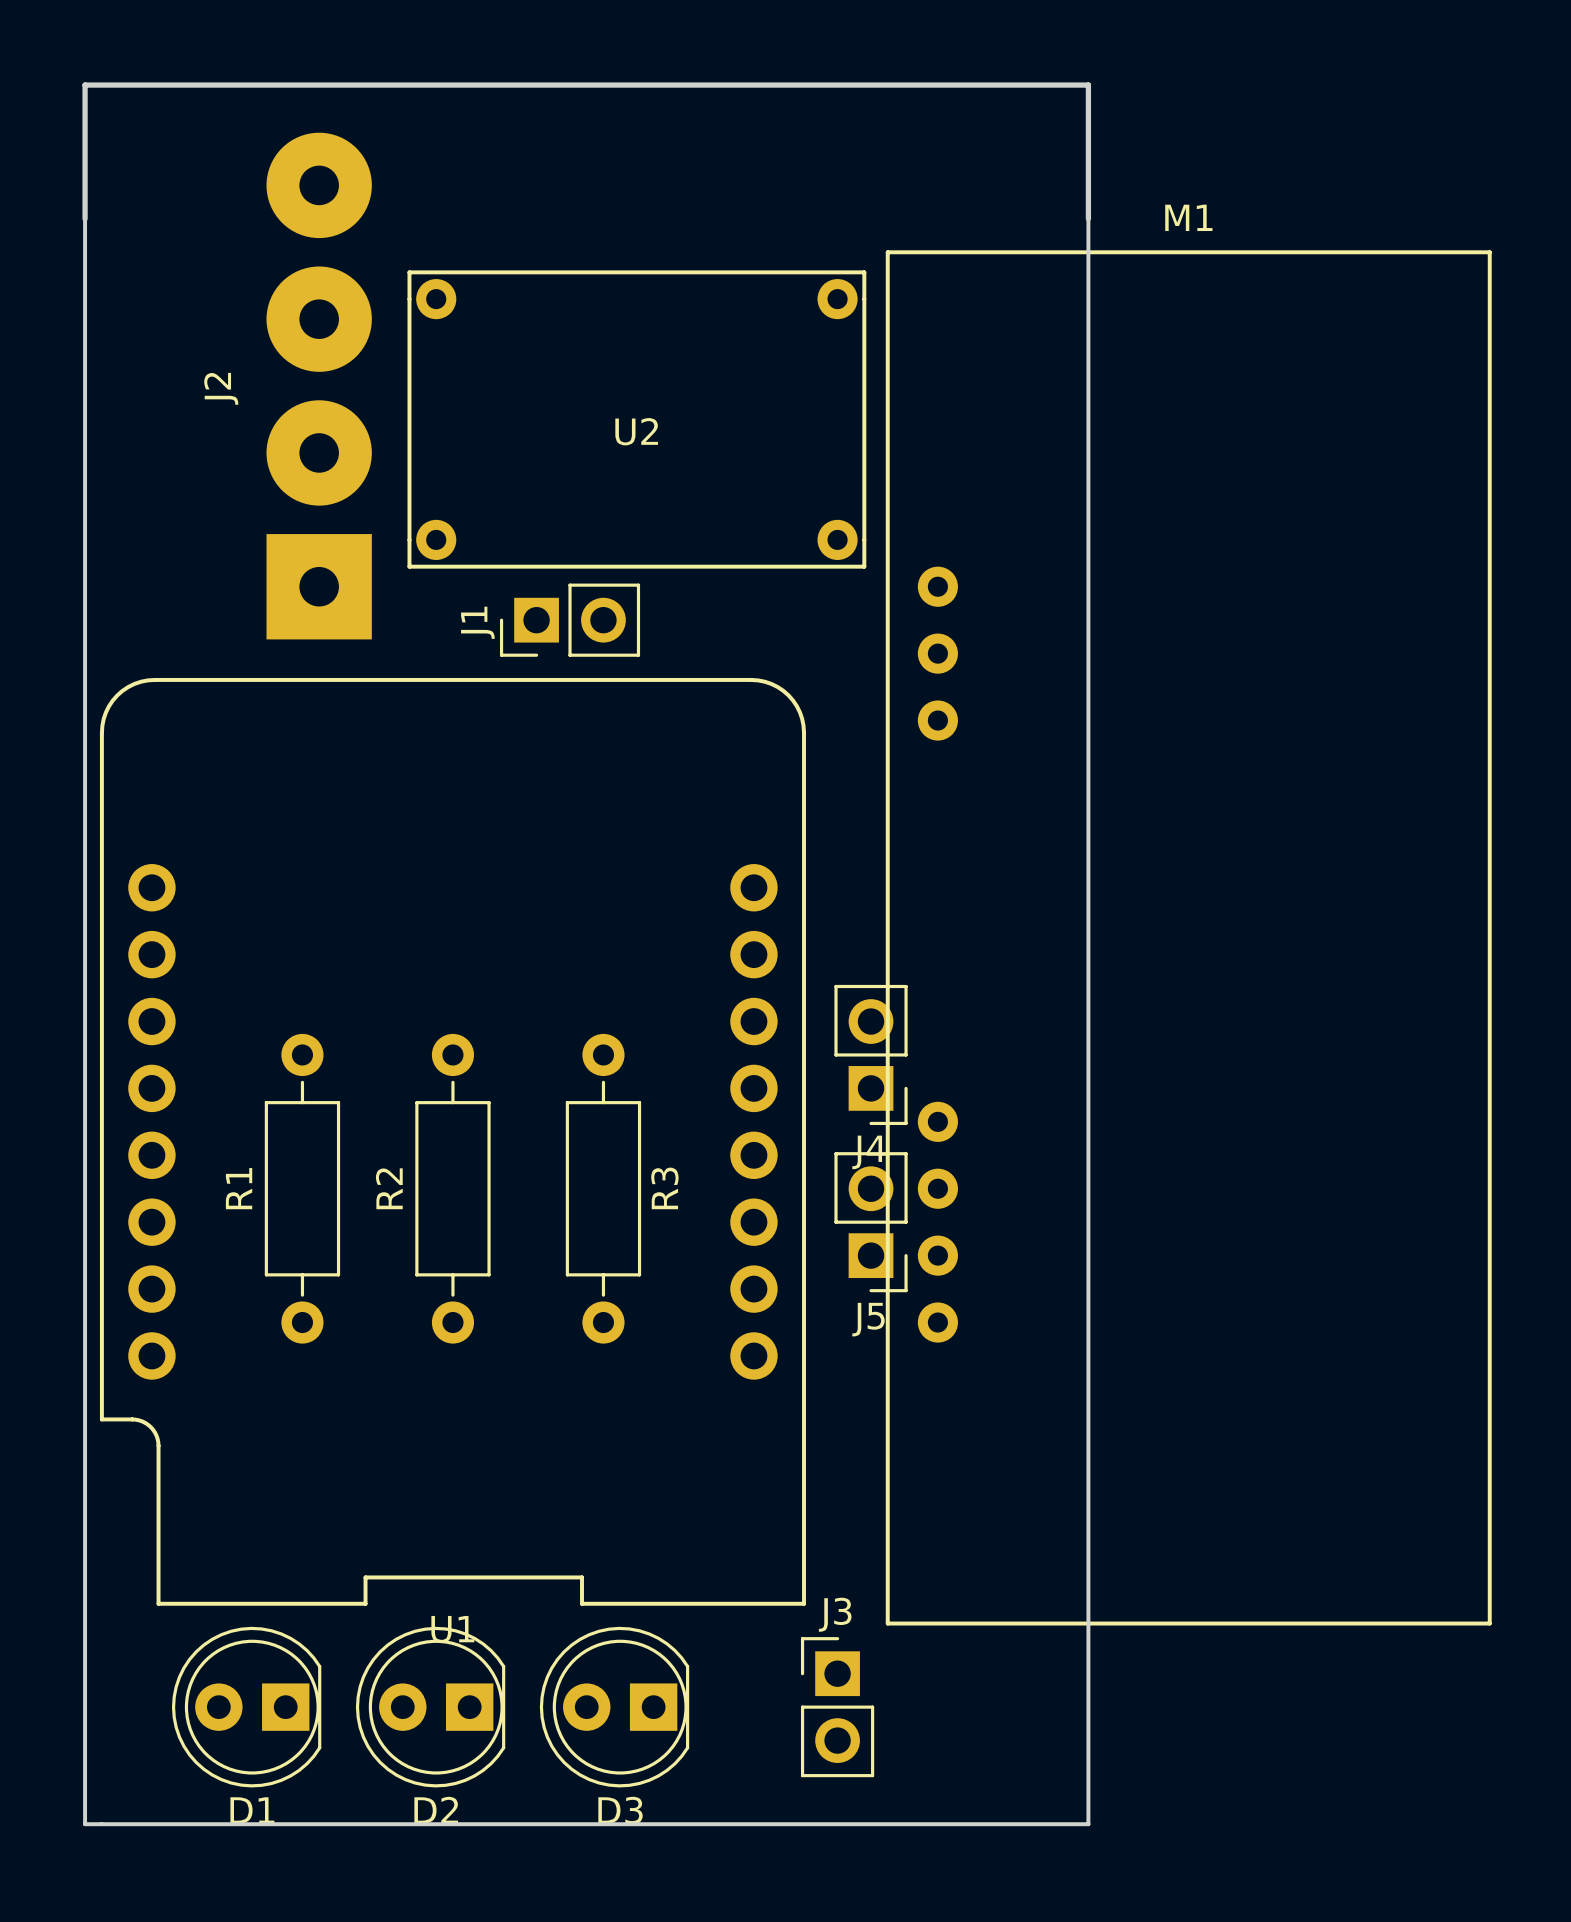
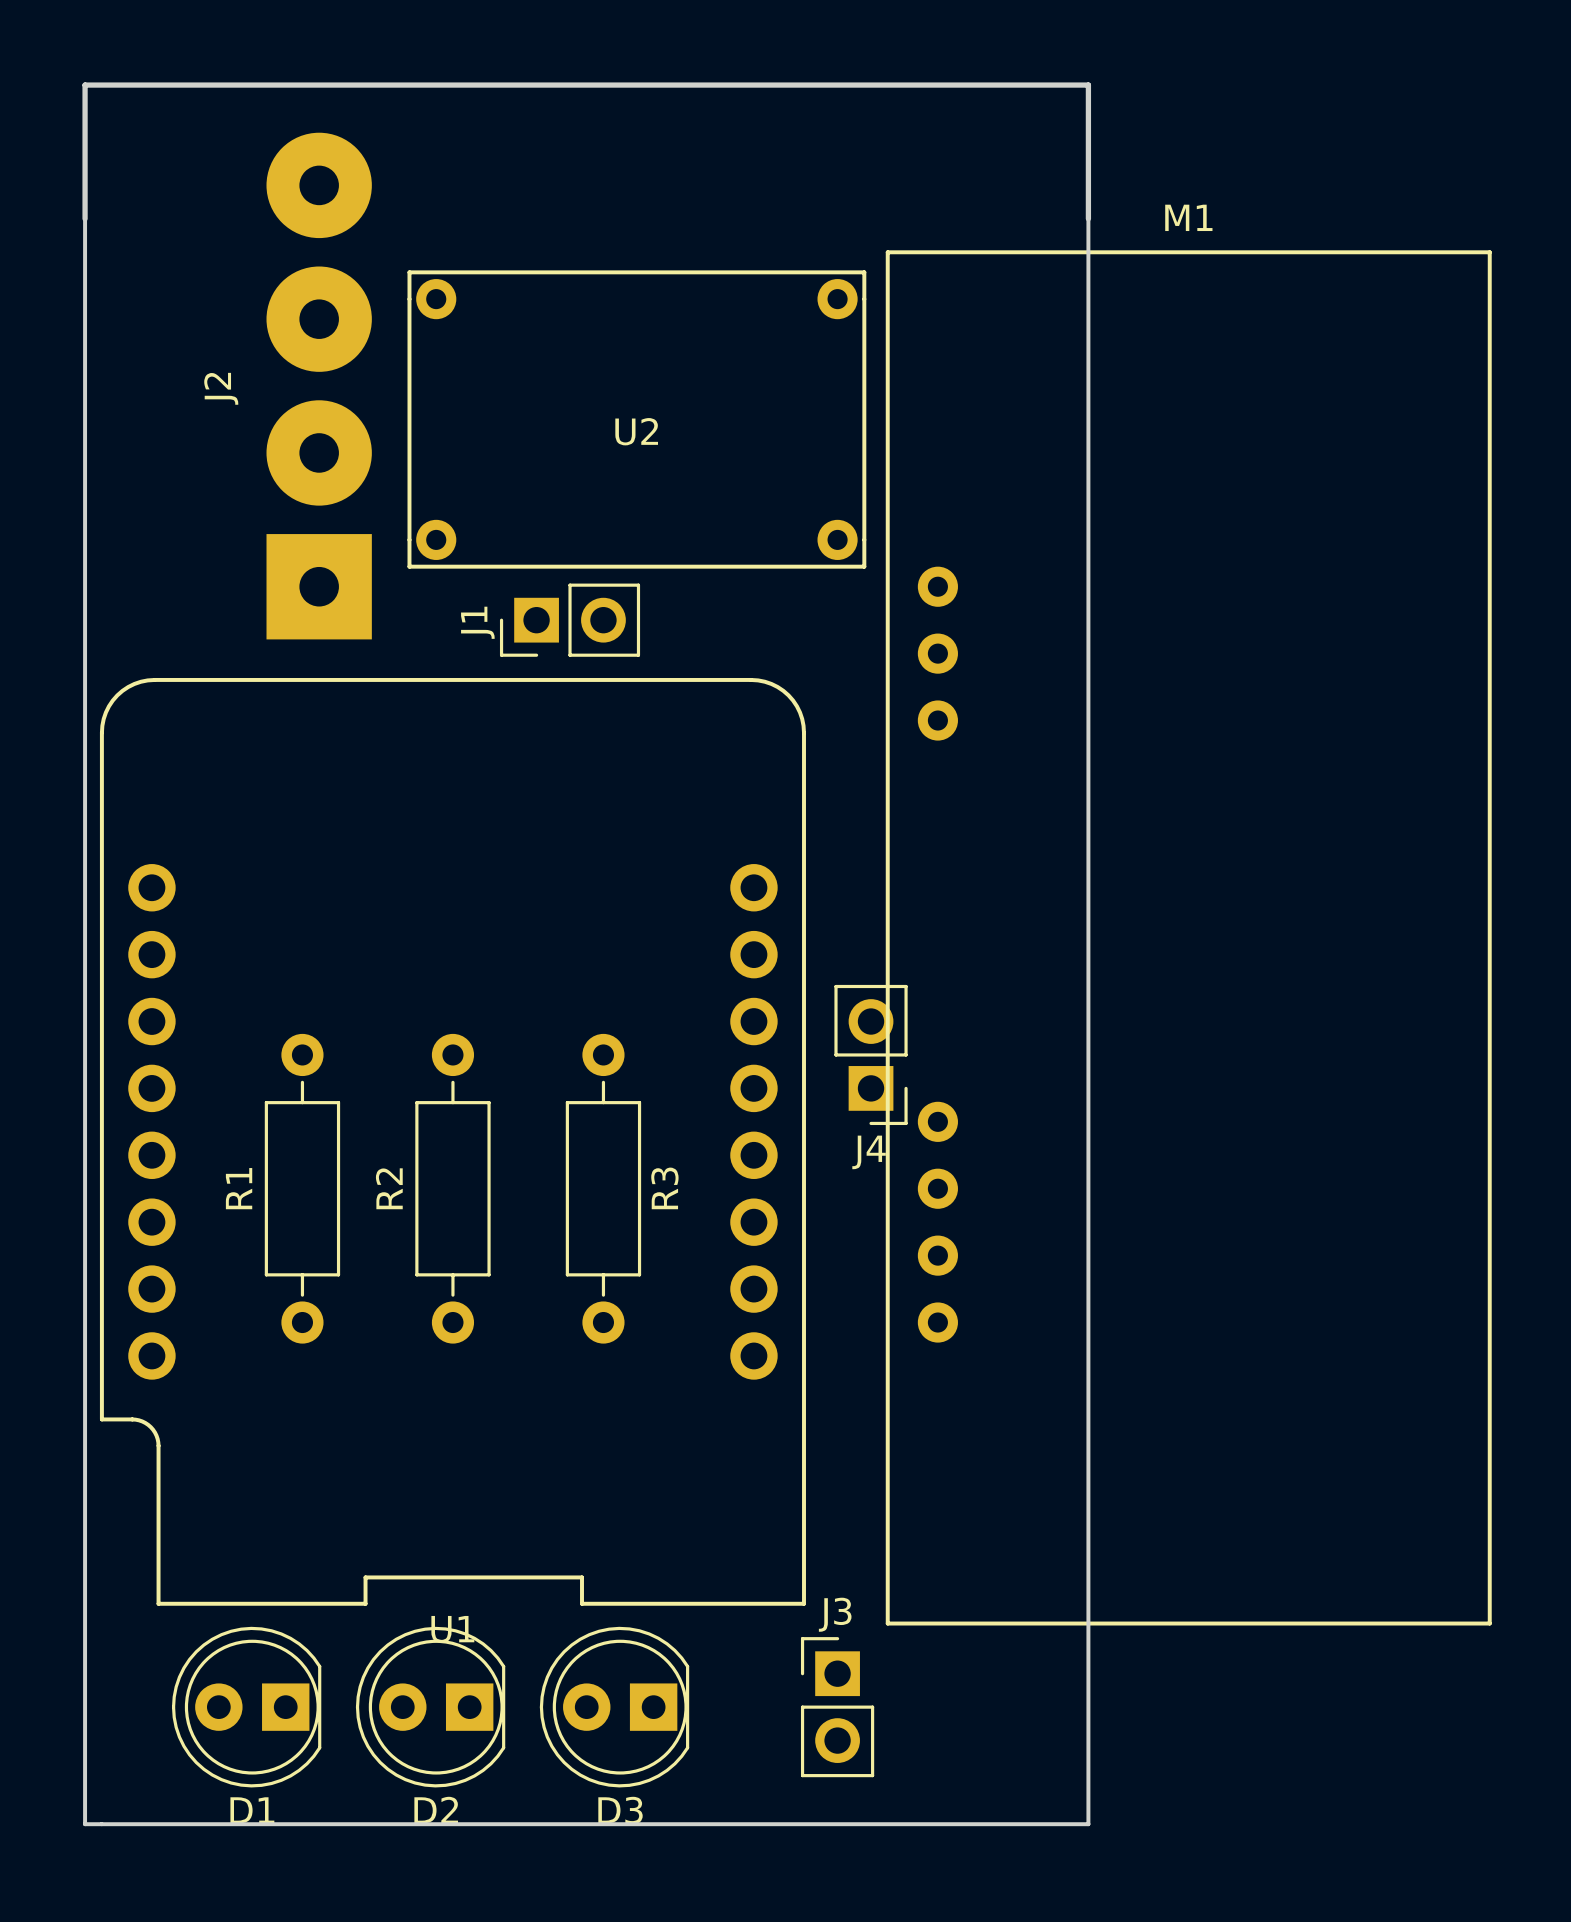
J5: (871, 1222) -> none

